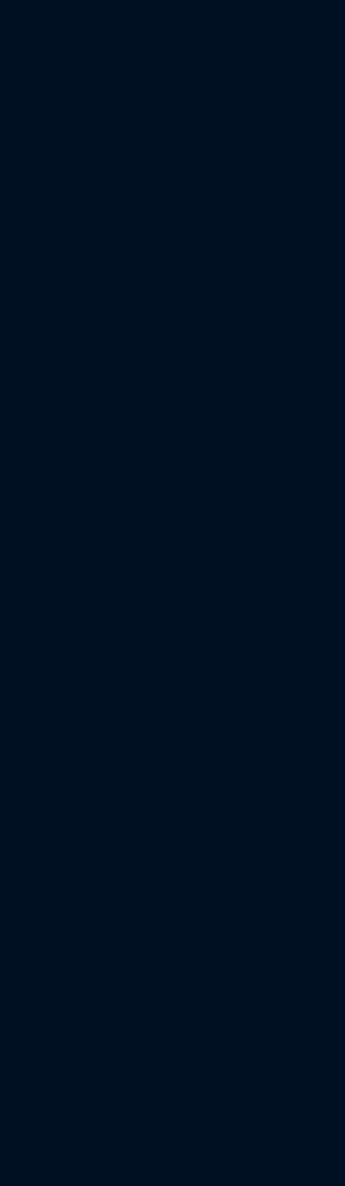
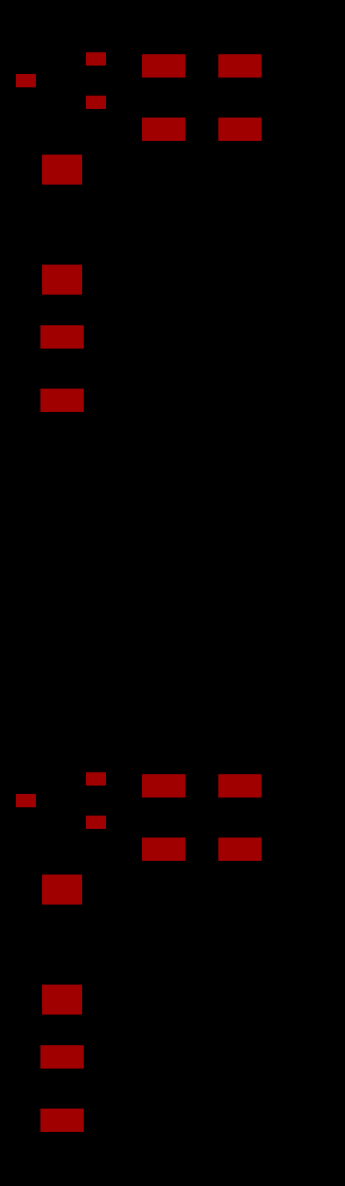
part: none -> (60, 80)
part: none -> (163, 97)
part: none -> (239, 97)
part: none -> (62, 224)
part: none -> (62, 368)
part: none -> (60, 800)
part: none -> (163, 817)
part: none -> (239, 817)
part: none -> (62, 944)
part: none -> (62, 1088)

